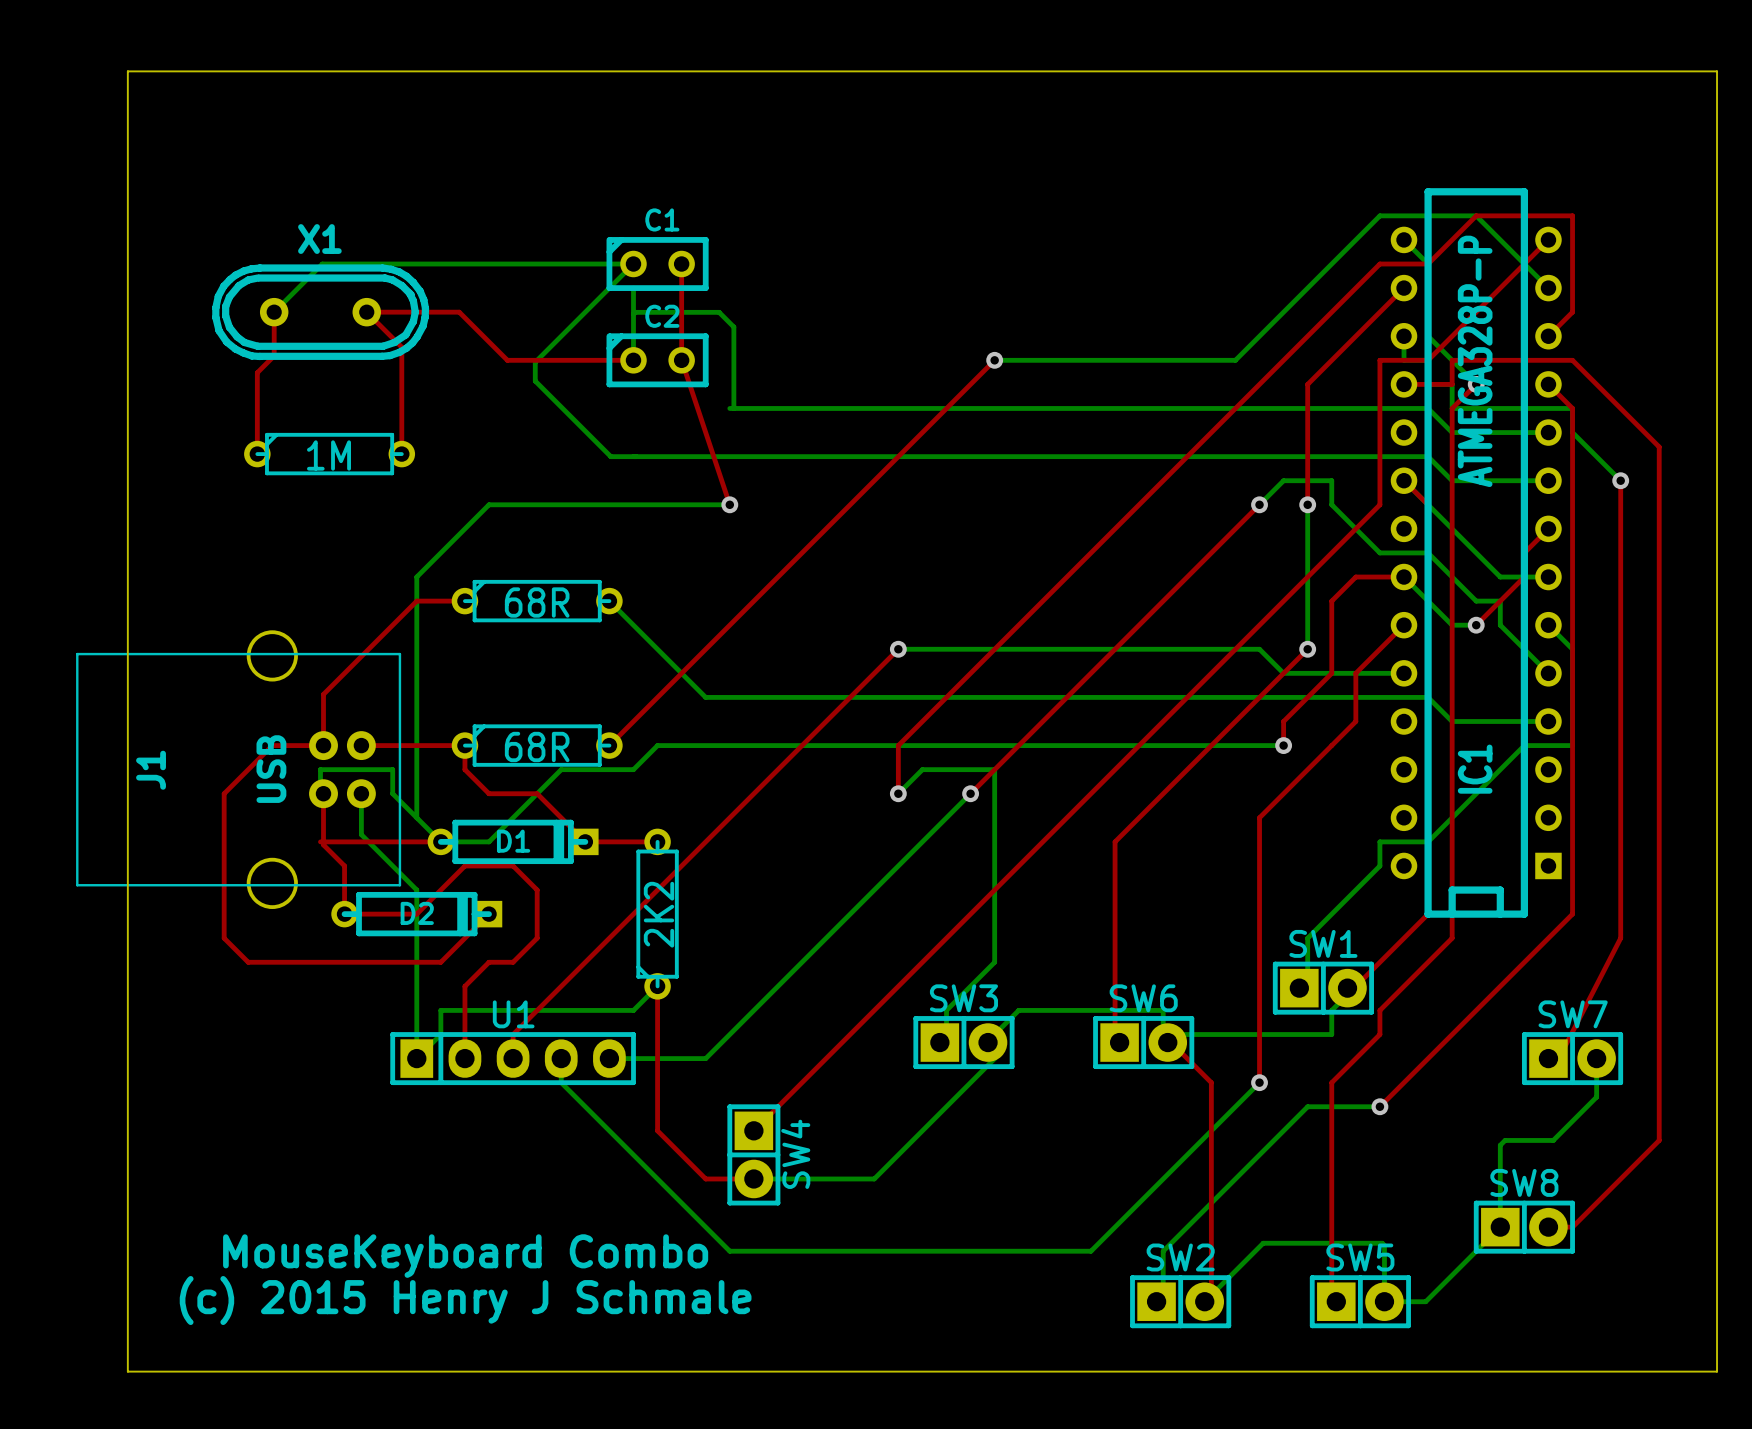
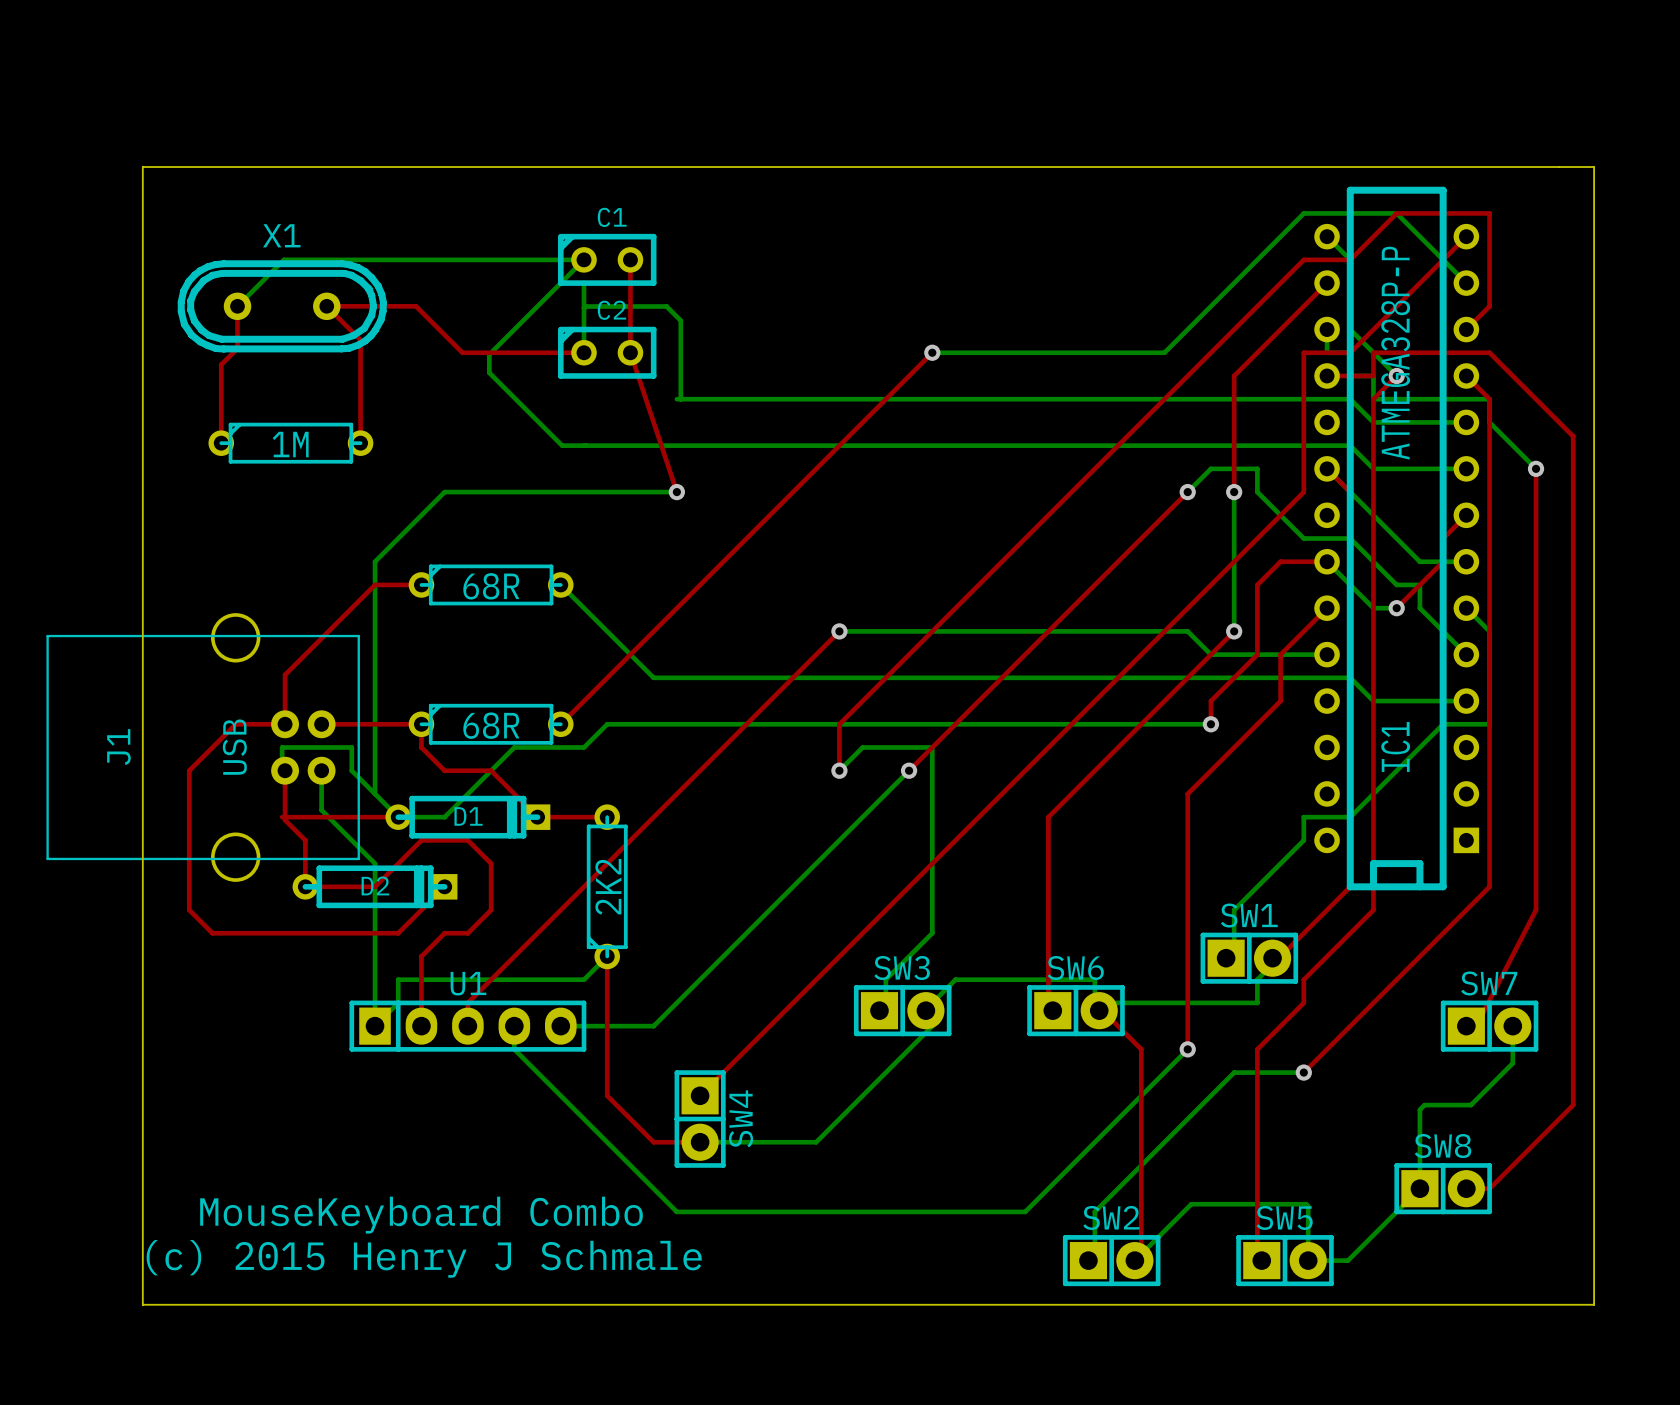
board edge: (127, 71) (127, 1371) (1717, 1371) (1717, 71) (127, 71) -> (142, 167) (142, 1304) (1594, 1304) (1594, 167) (142, 167)

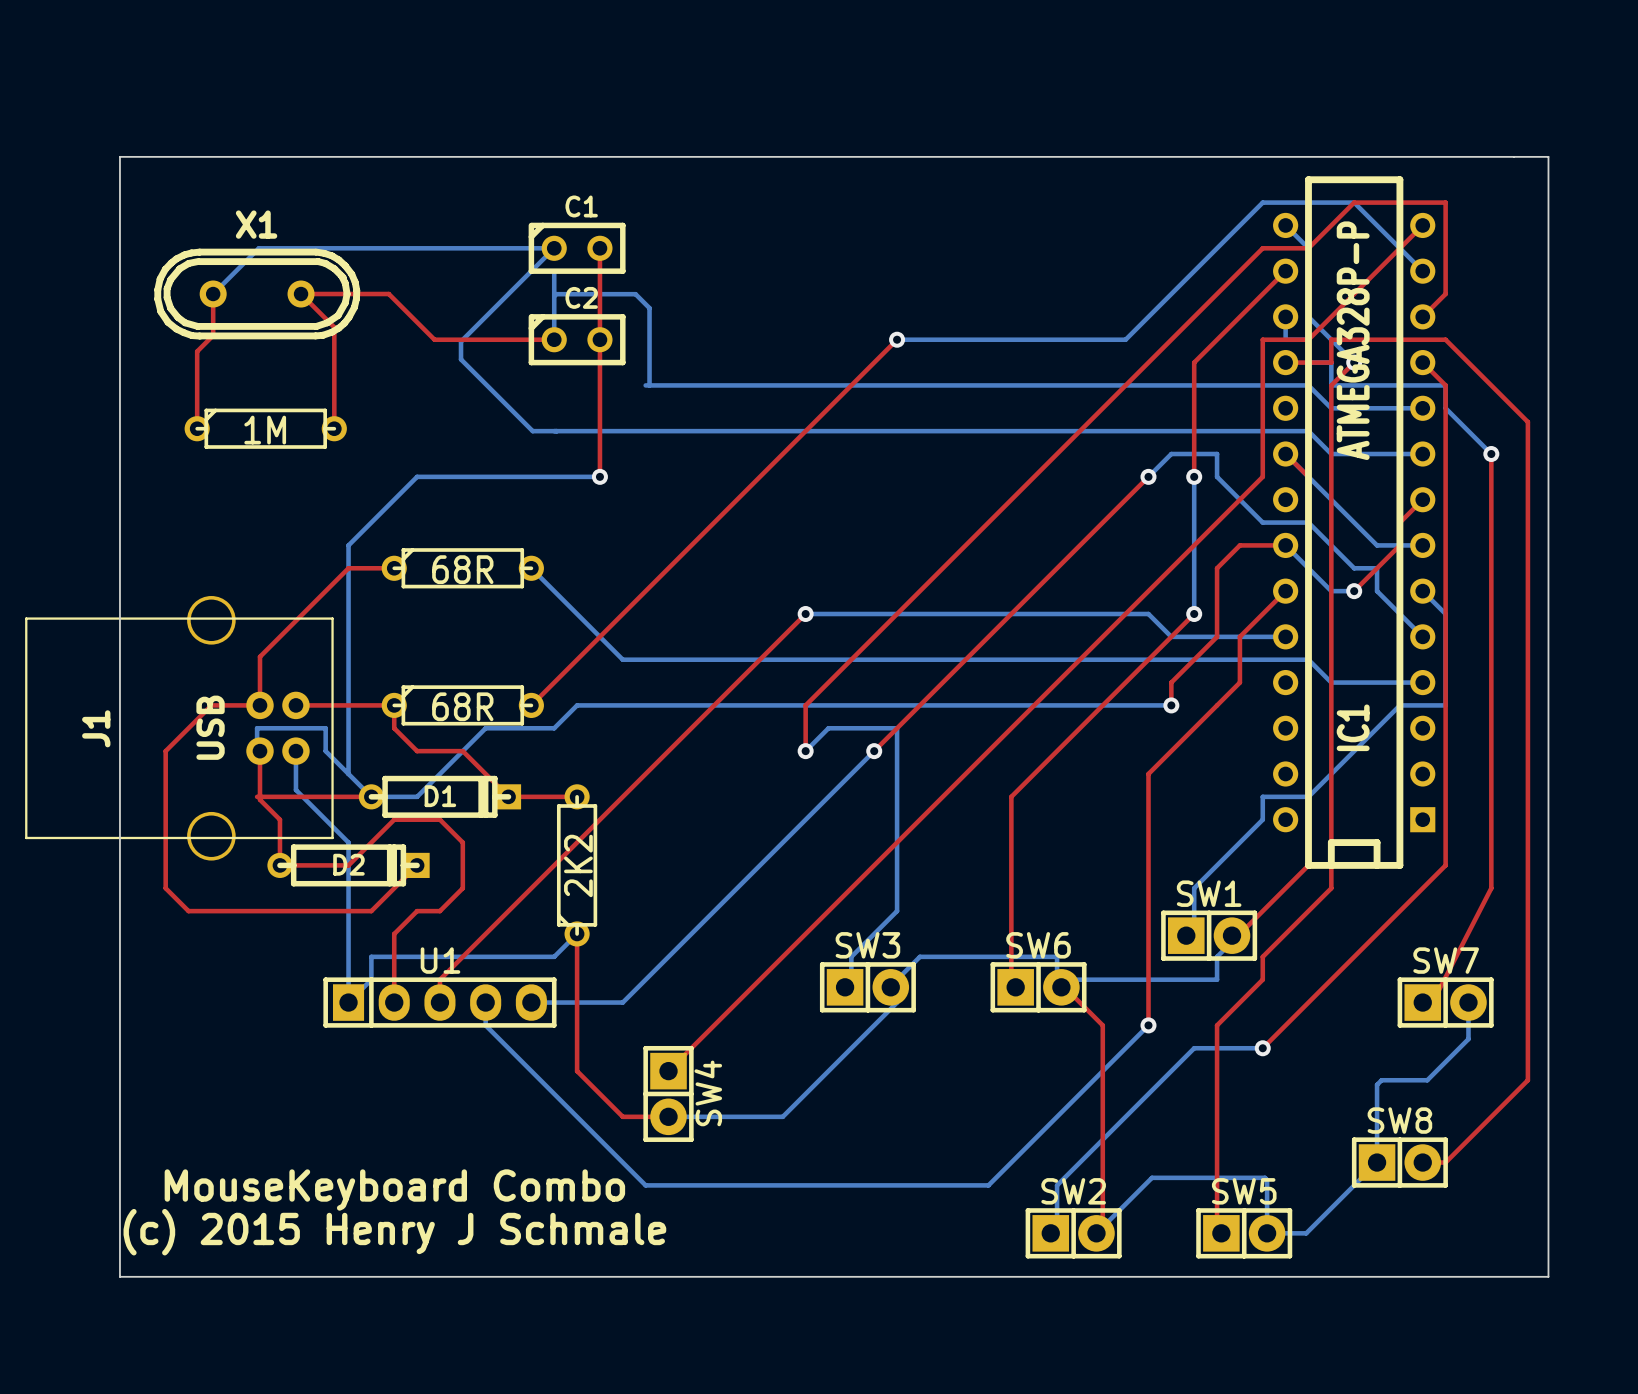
top track: (630, 352) (676, 492) -> (599, 339) (599, 476)
bottom track: (630, 492) (676, 492) -> none
via position: (676, 492) -> (599, 476)

